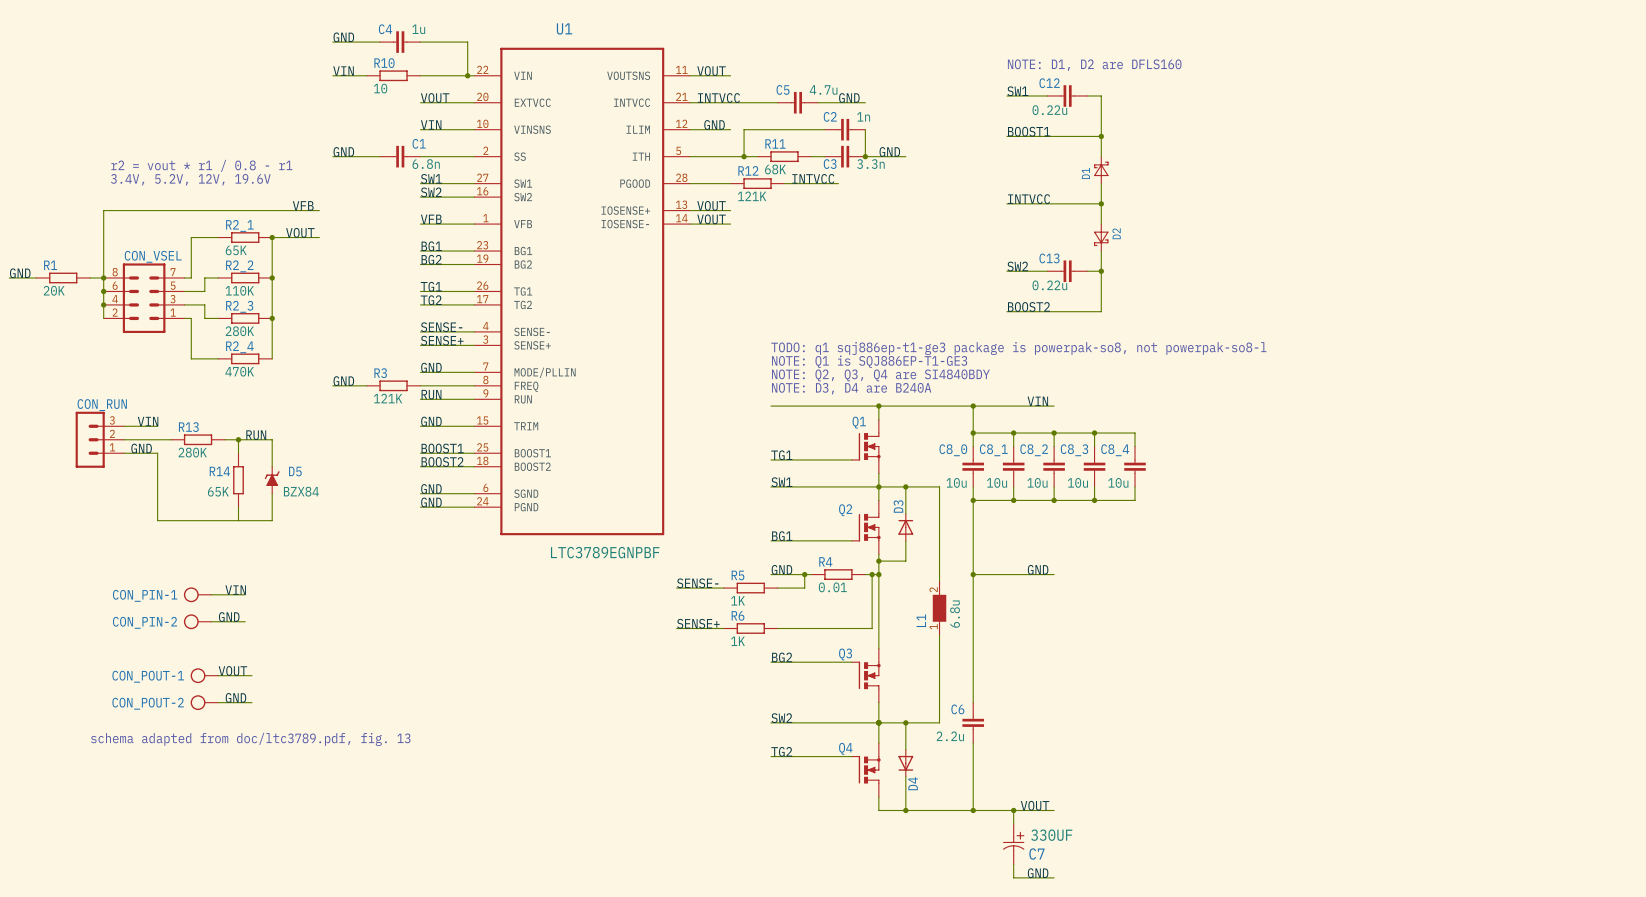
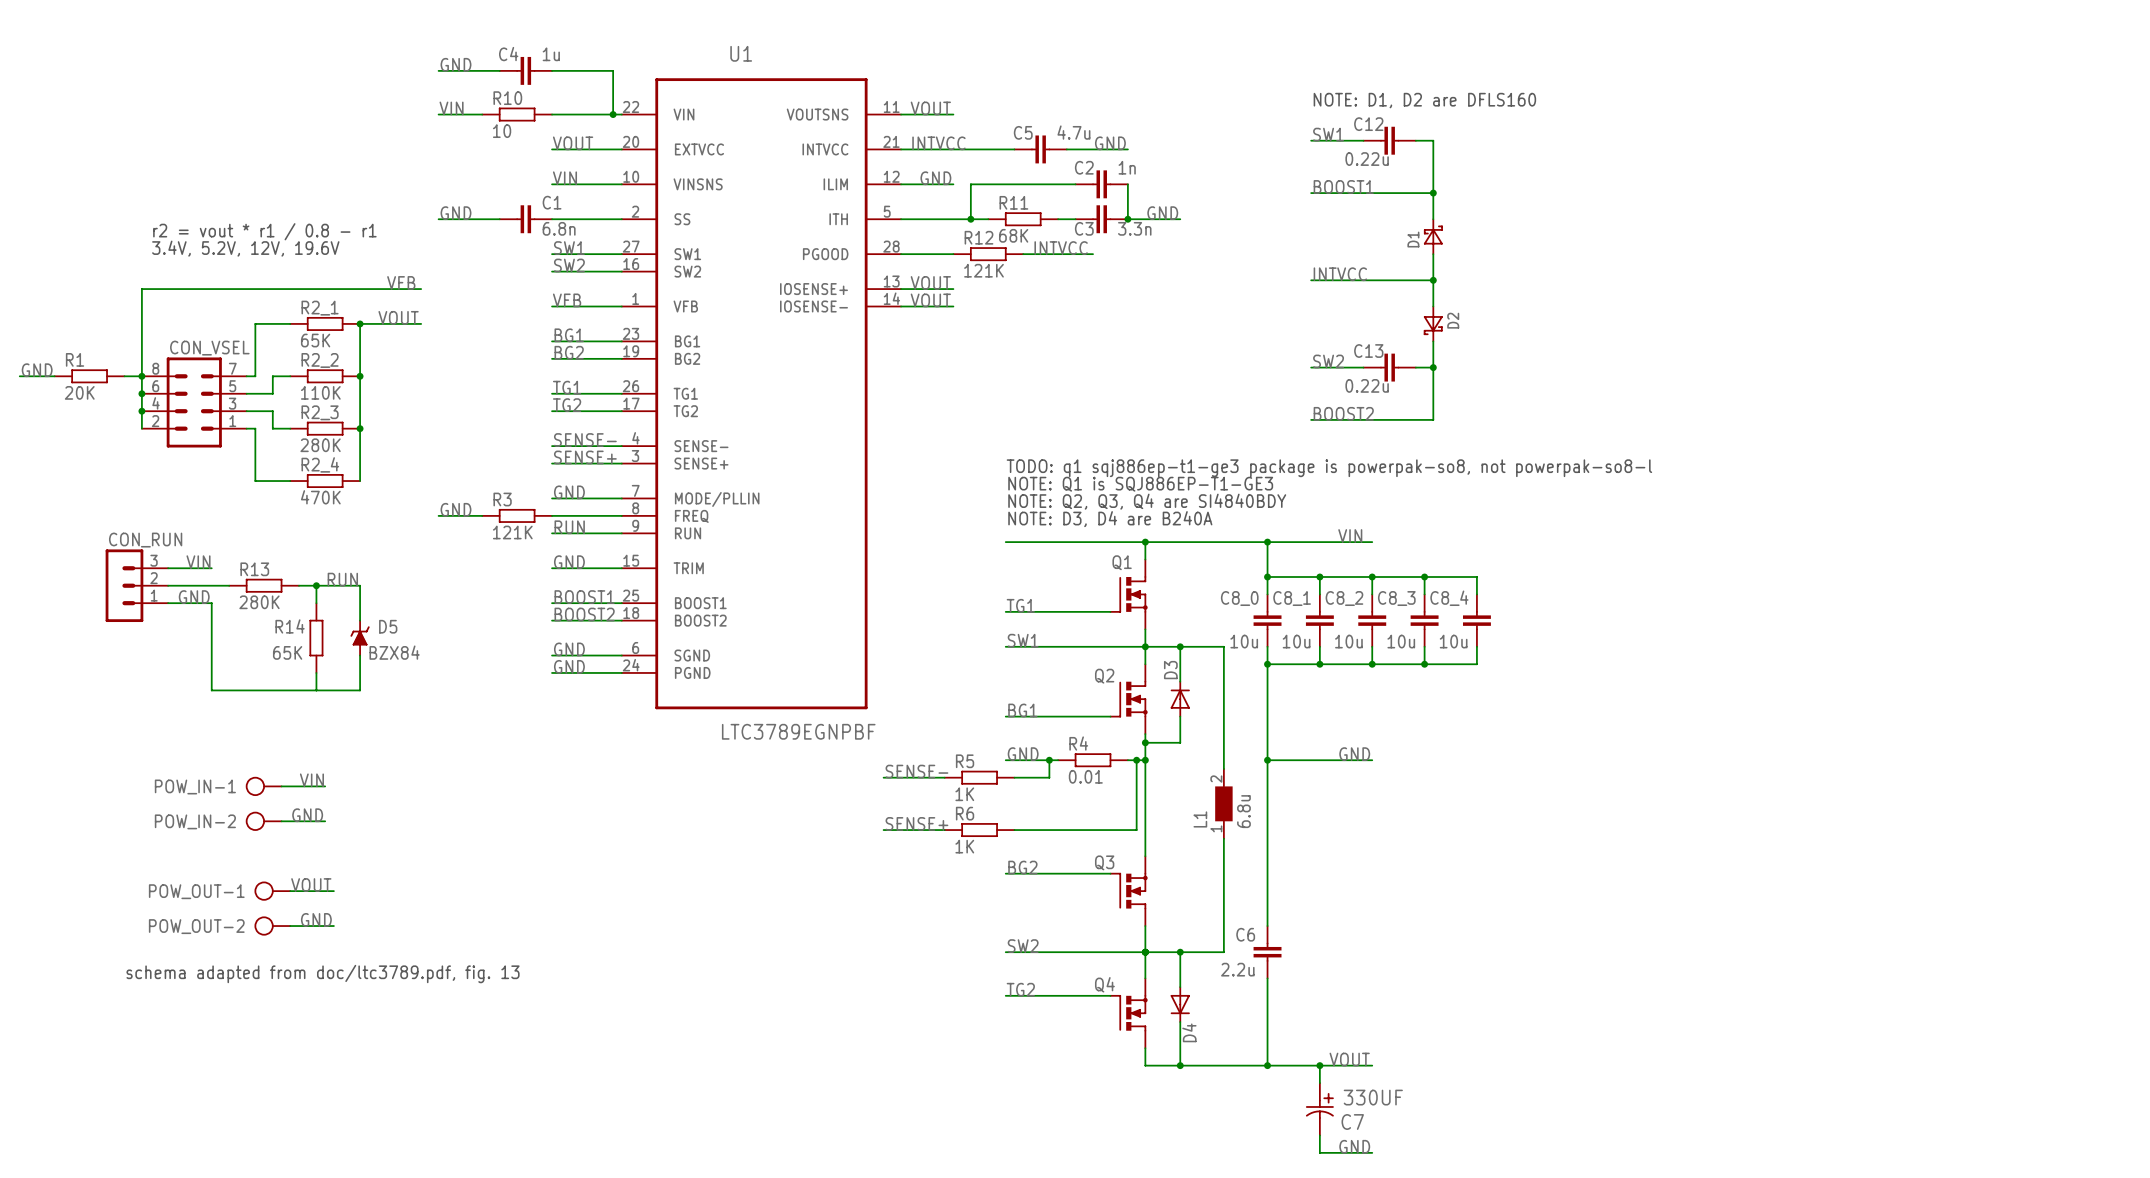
CON_PIN-1 name: CON_PIN-1 (145, 595) -> POW_IN-1 (195, 786)
CON_PIN-2 name: CON_PIN-2 (145, 622) -> POW_IN-2 (195, 821)
CON_POUT-1 name: CON_POUT-1 (148, 676) -> POW_OUT-1 (196, 891)
CON_POUT-2 name: CON_POUT-2 (148, 703) -> POW_OUT-2 (196, 926)

